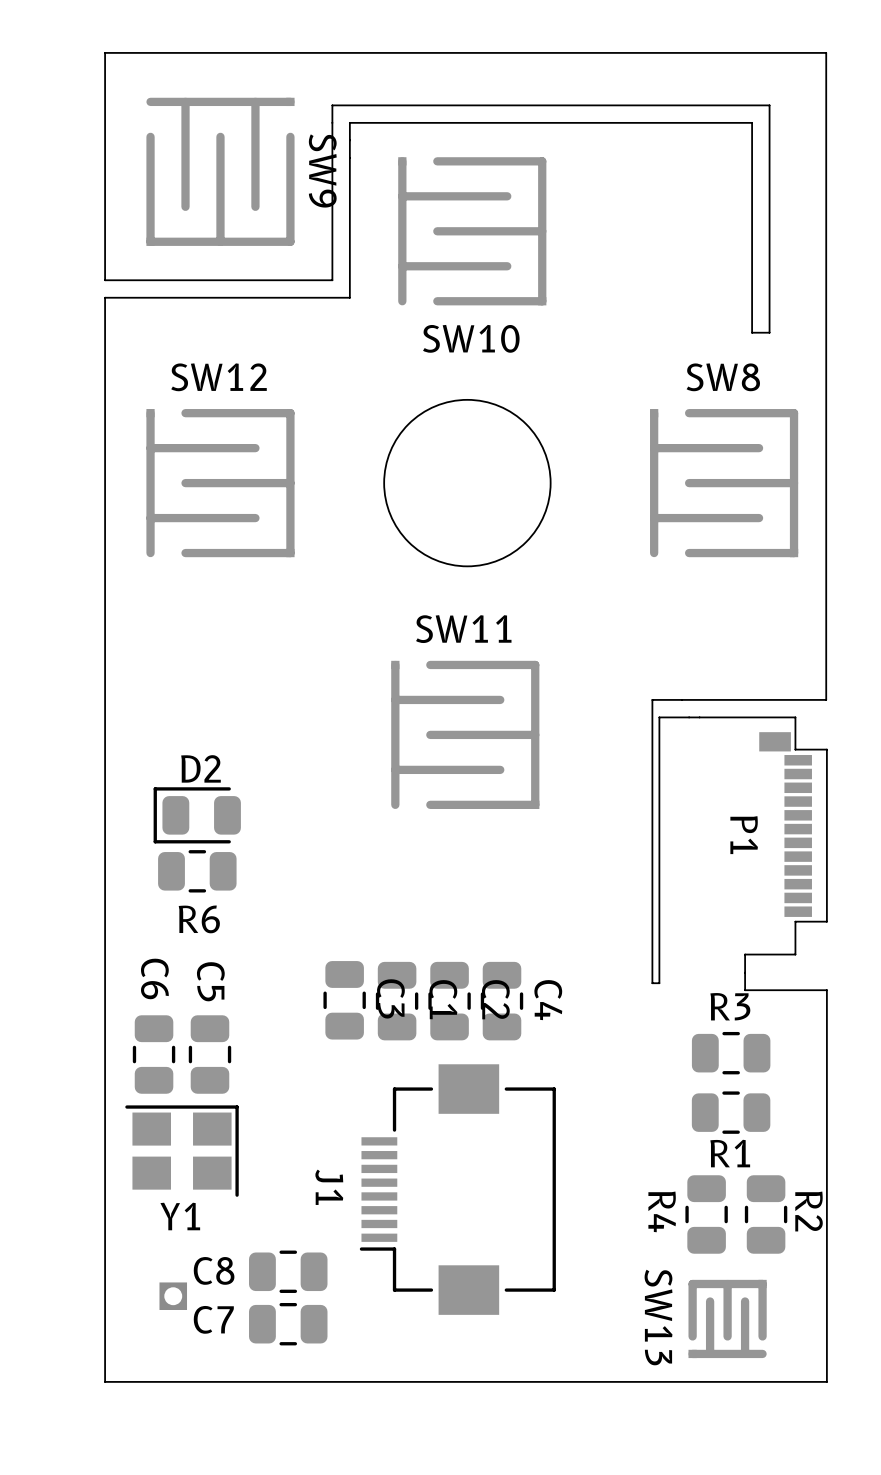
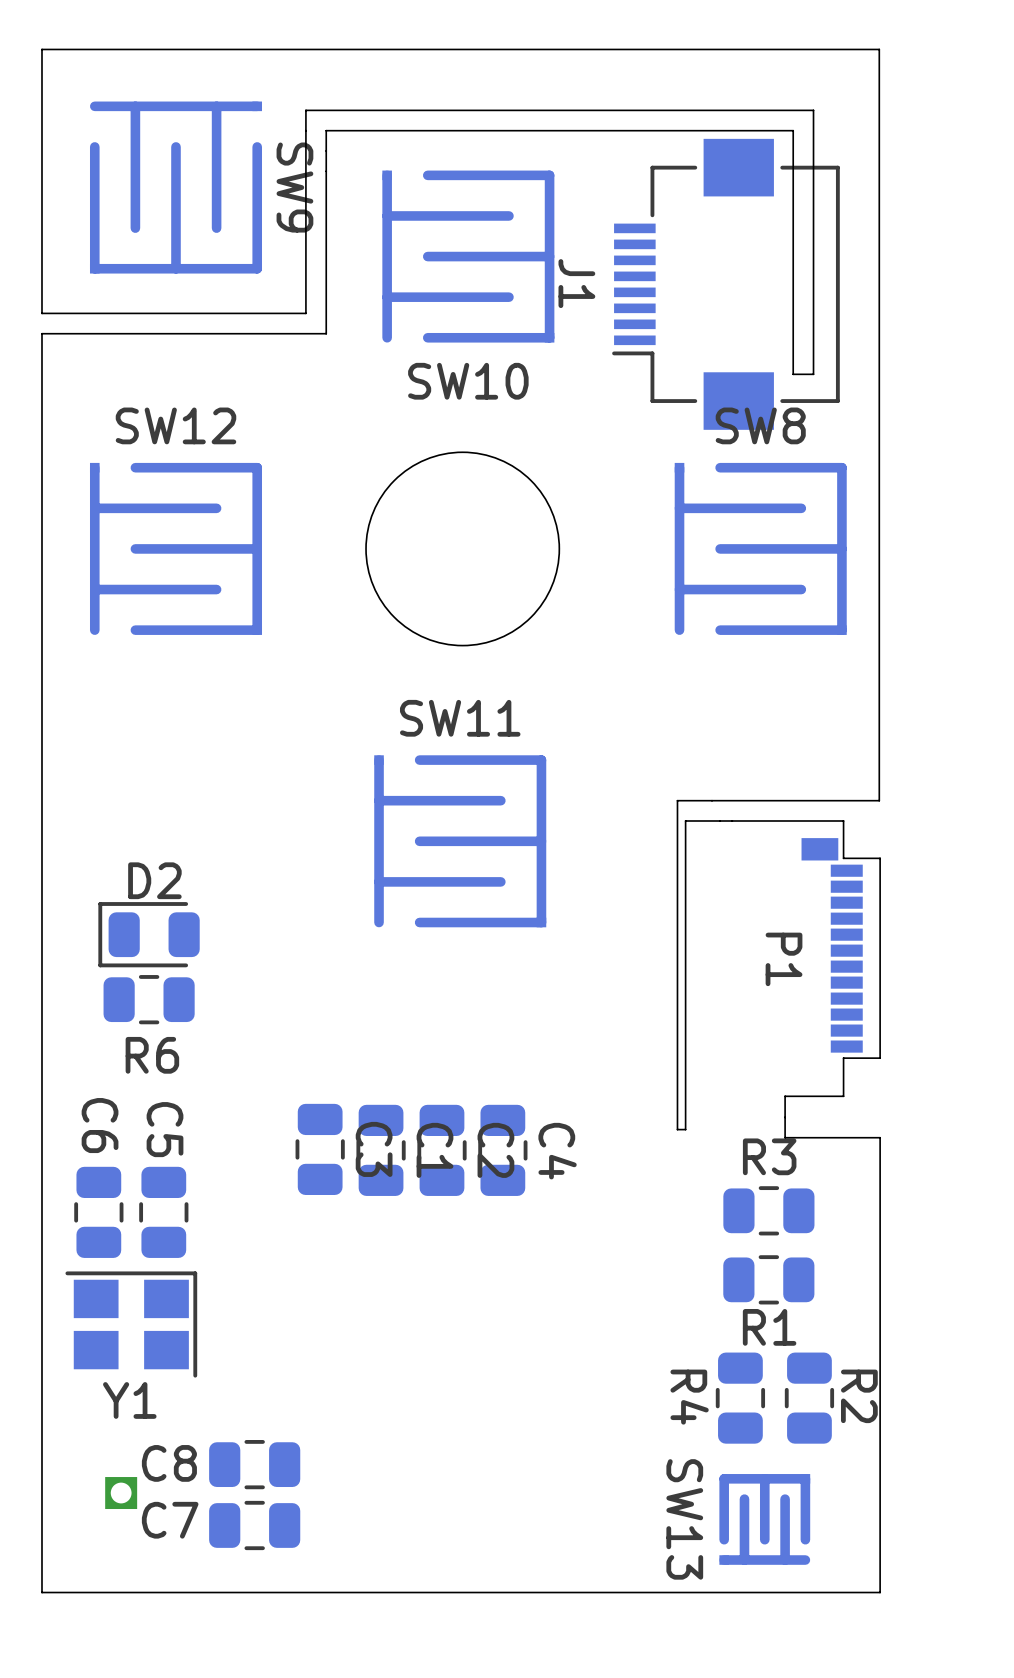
J1 position: (457, 1189) -> (725, 284)

